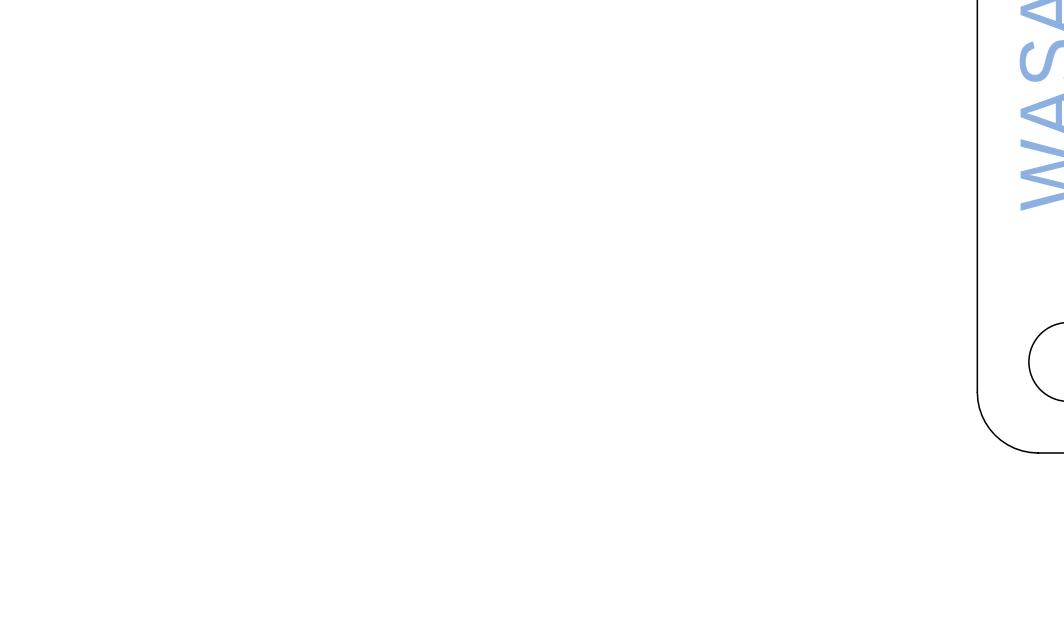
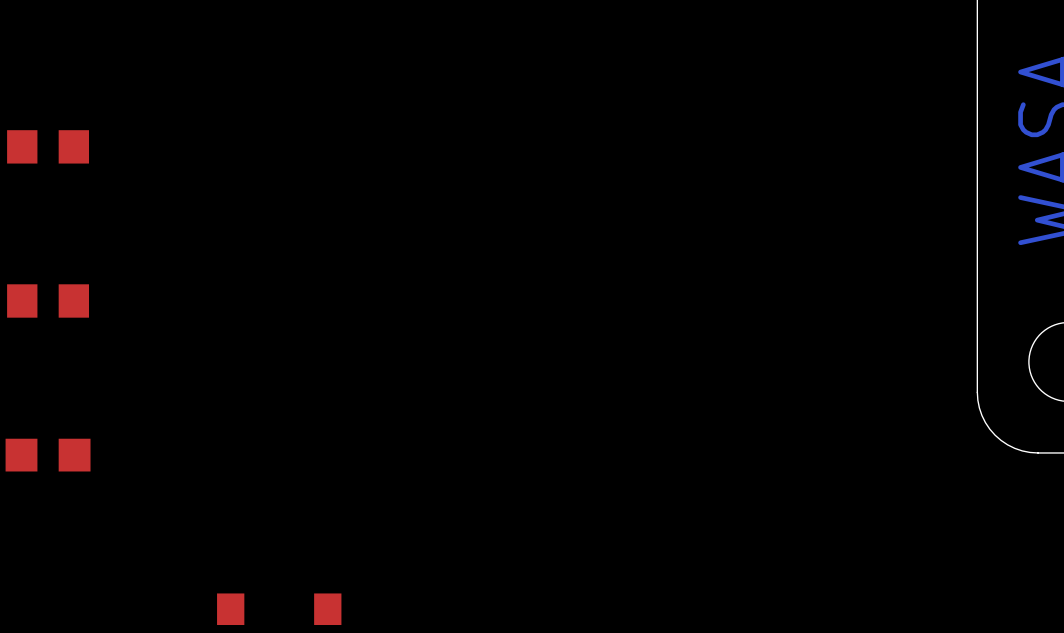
part: none -> (48, 146)
part: none -> (48, 300)
part: none -> (48, 455)
part: none -> (279, 609)

